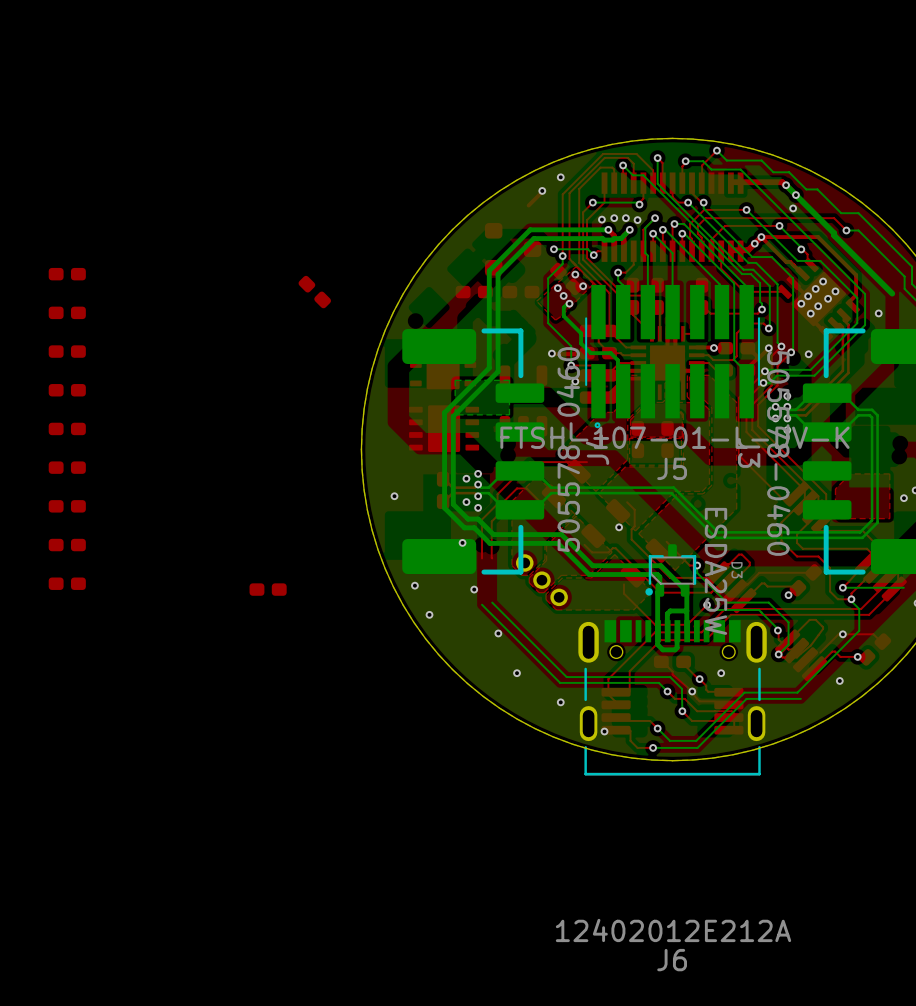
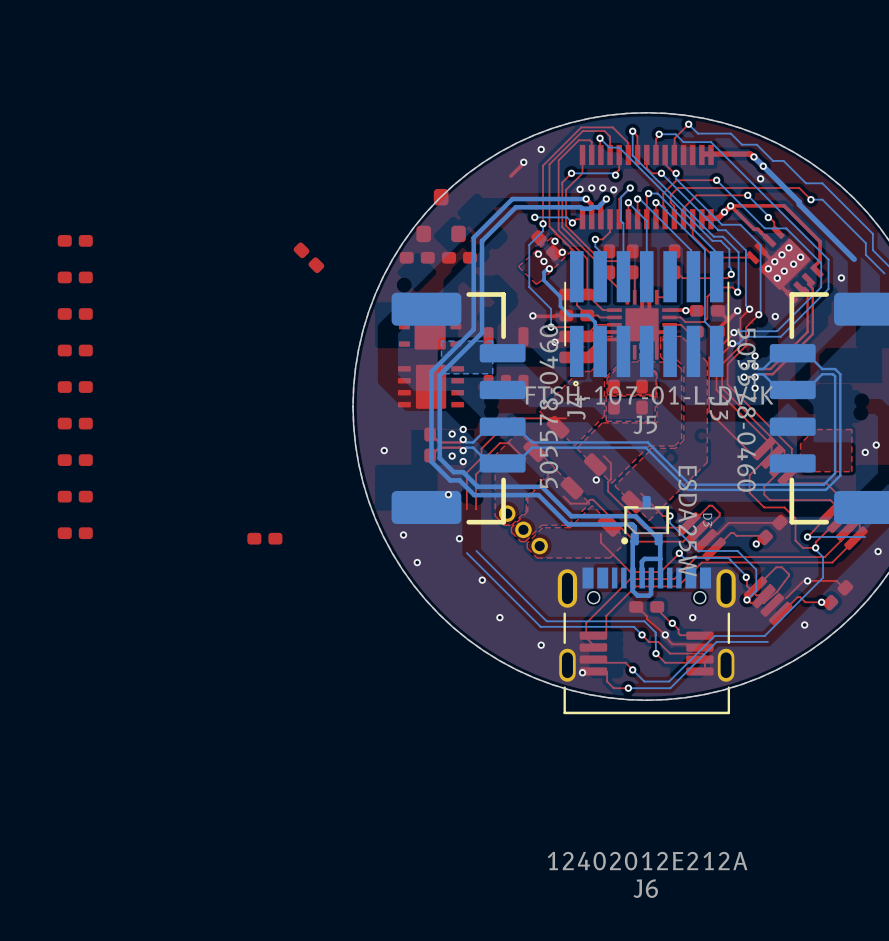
part rotation: 0° (513, 249) -> 90° counterclockwise (441, 215)
part position: (513, 249) -> (441, 215)
part position: (520, 292) -> (417, 257)

